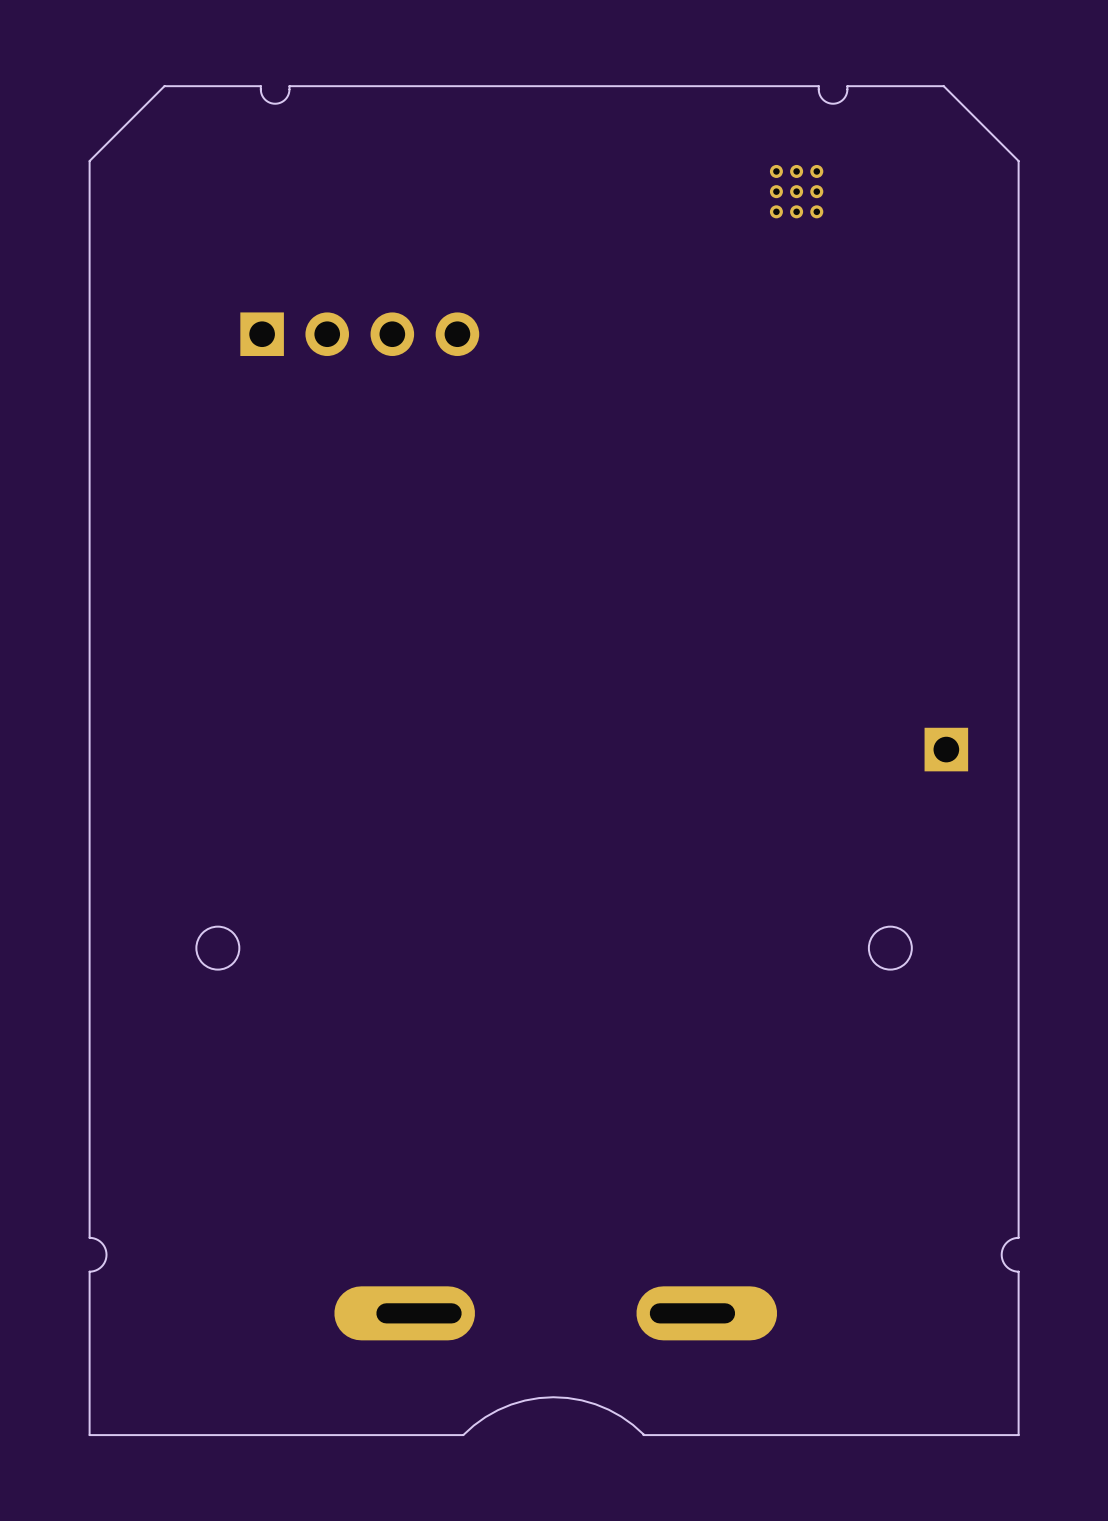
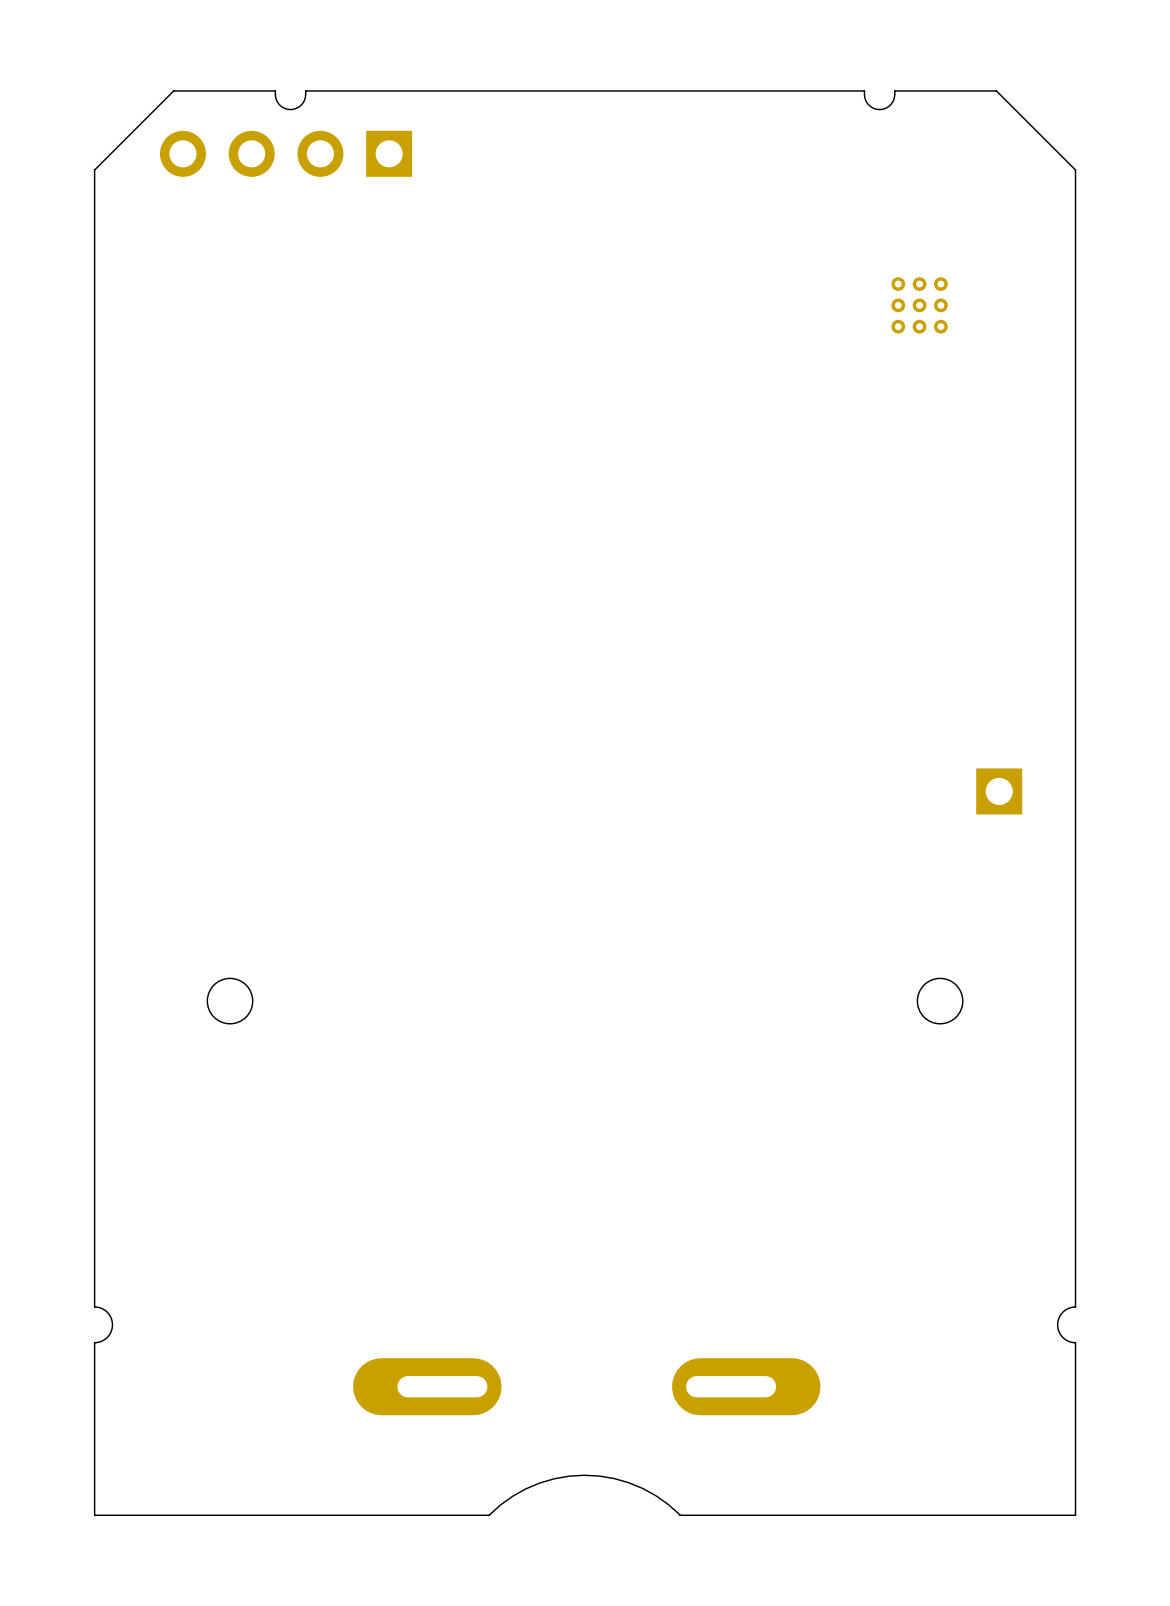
part position: (796, 191) -> (919, 305)
part rotation: 0° (359, 334) -> 180° (286, 153)
part position: (359, 334) -> (286, 153)

